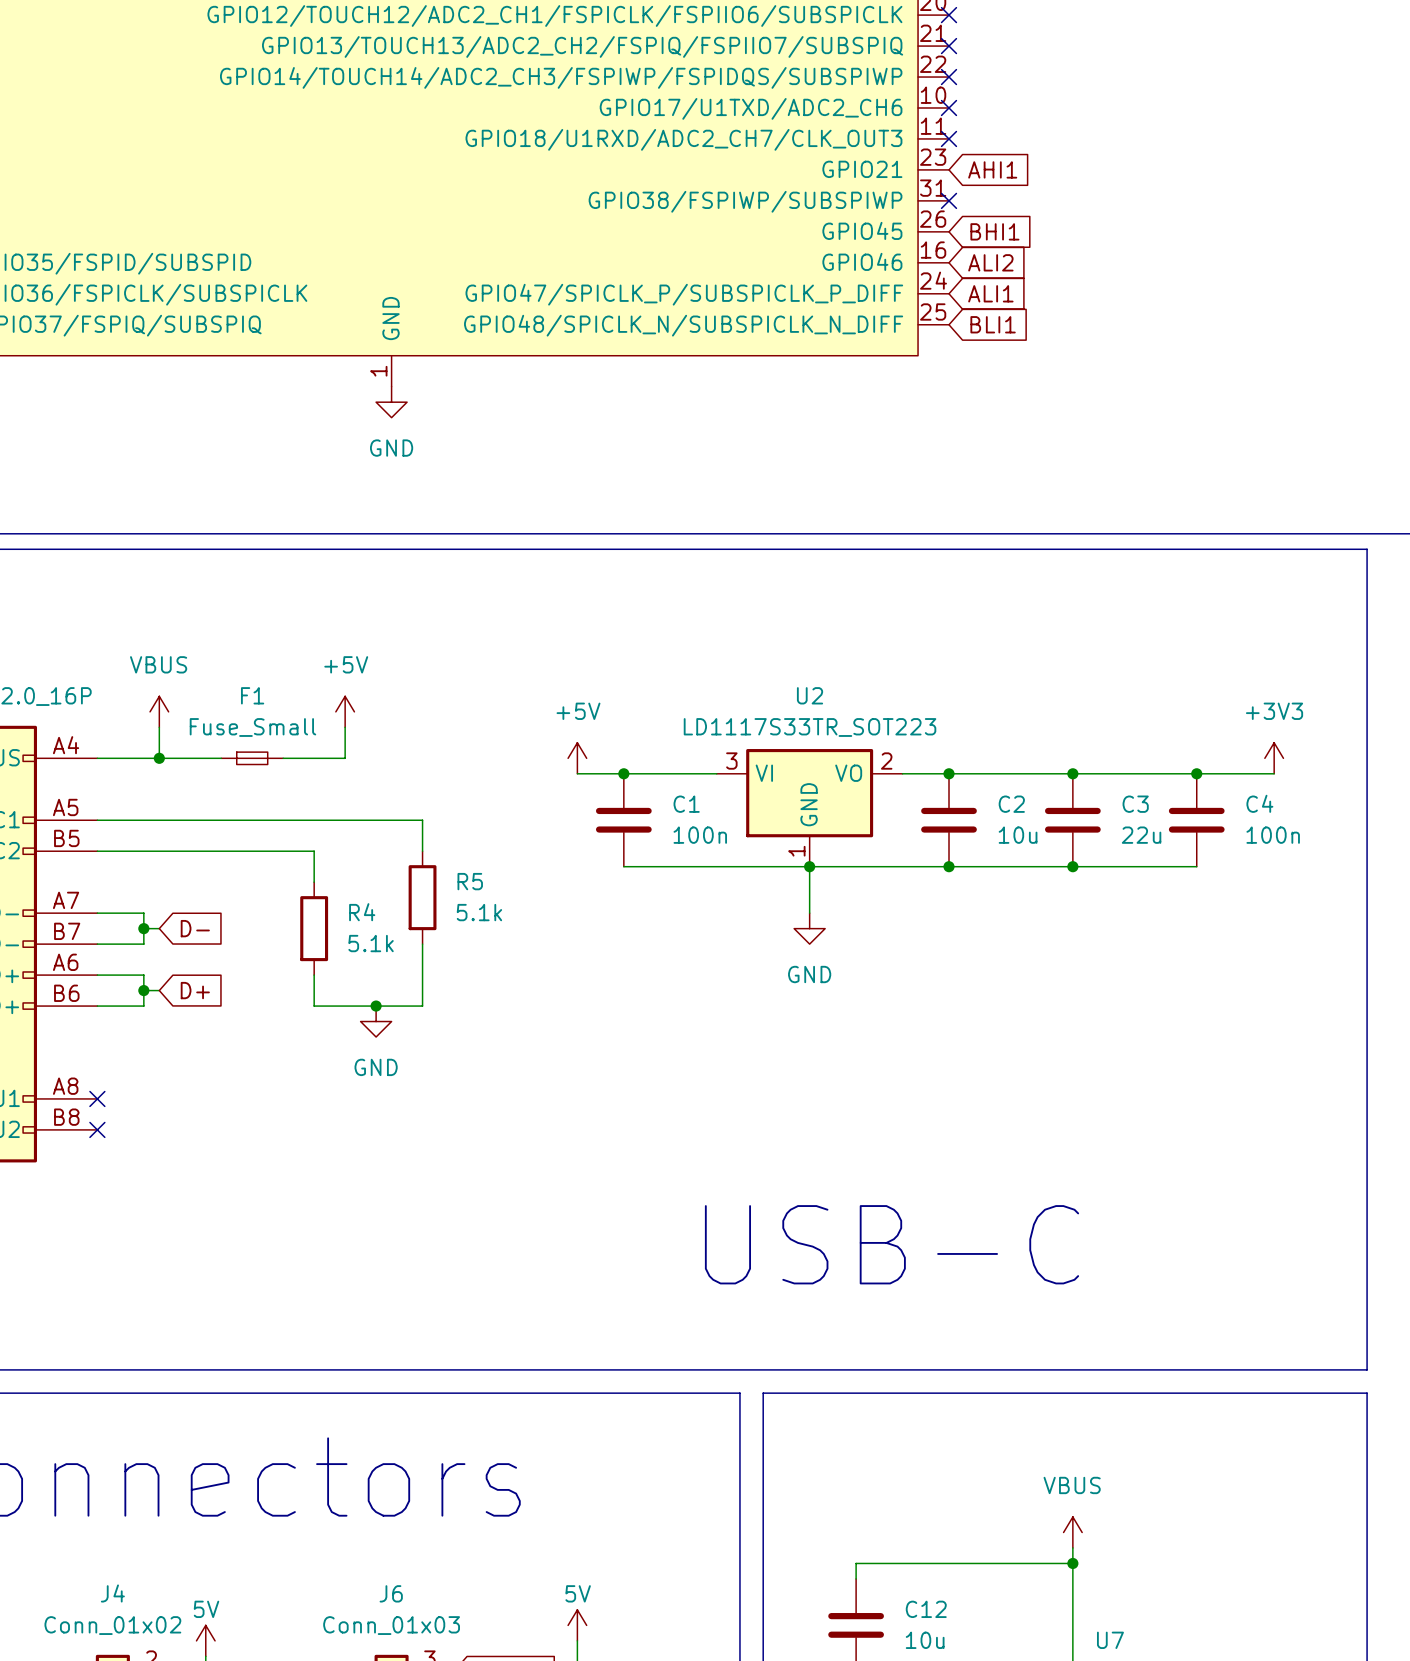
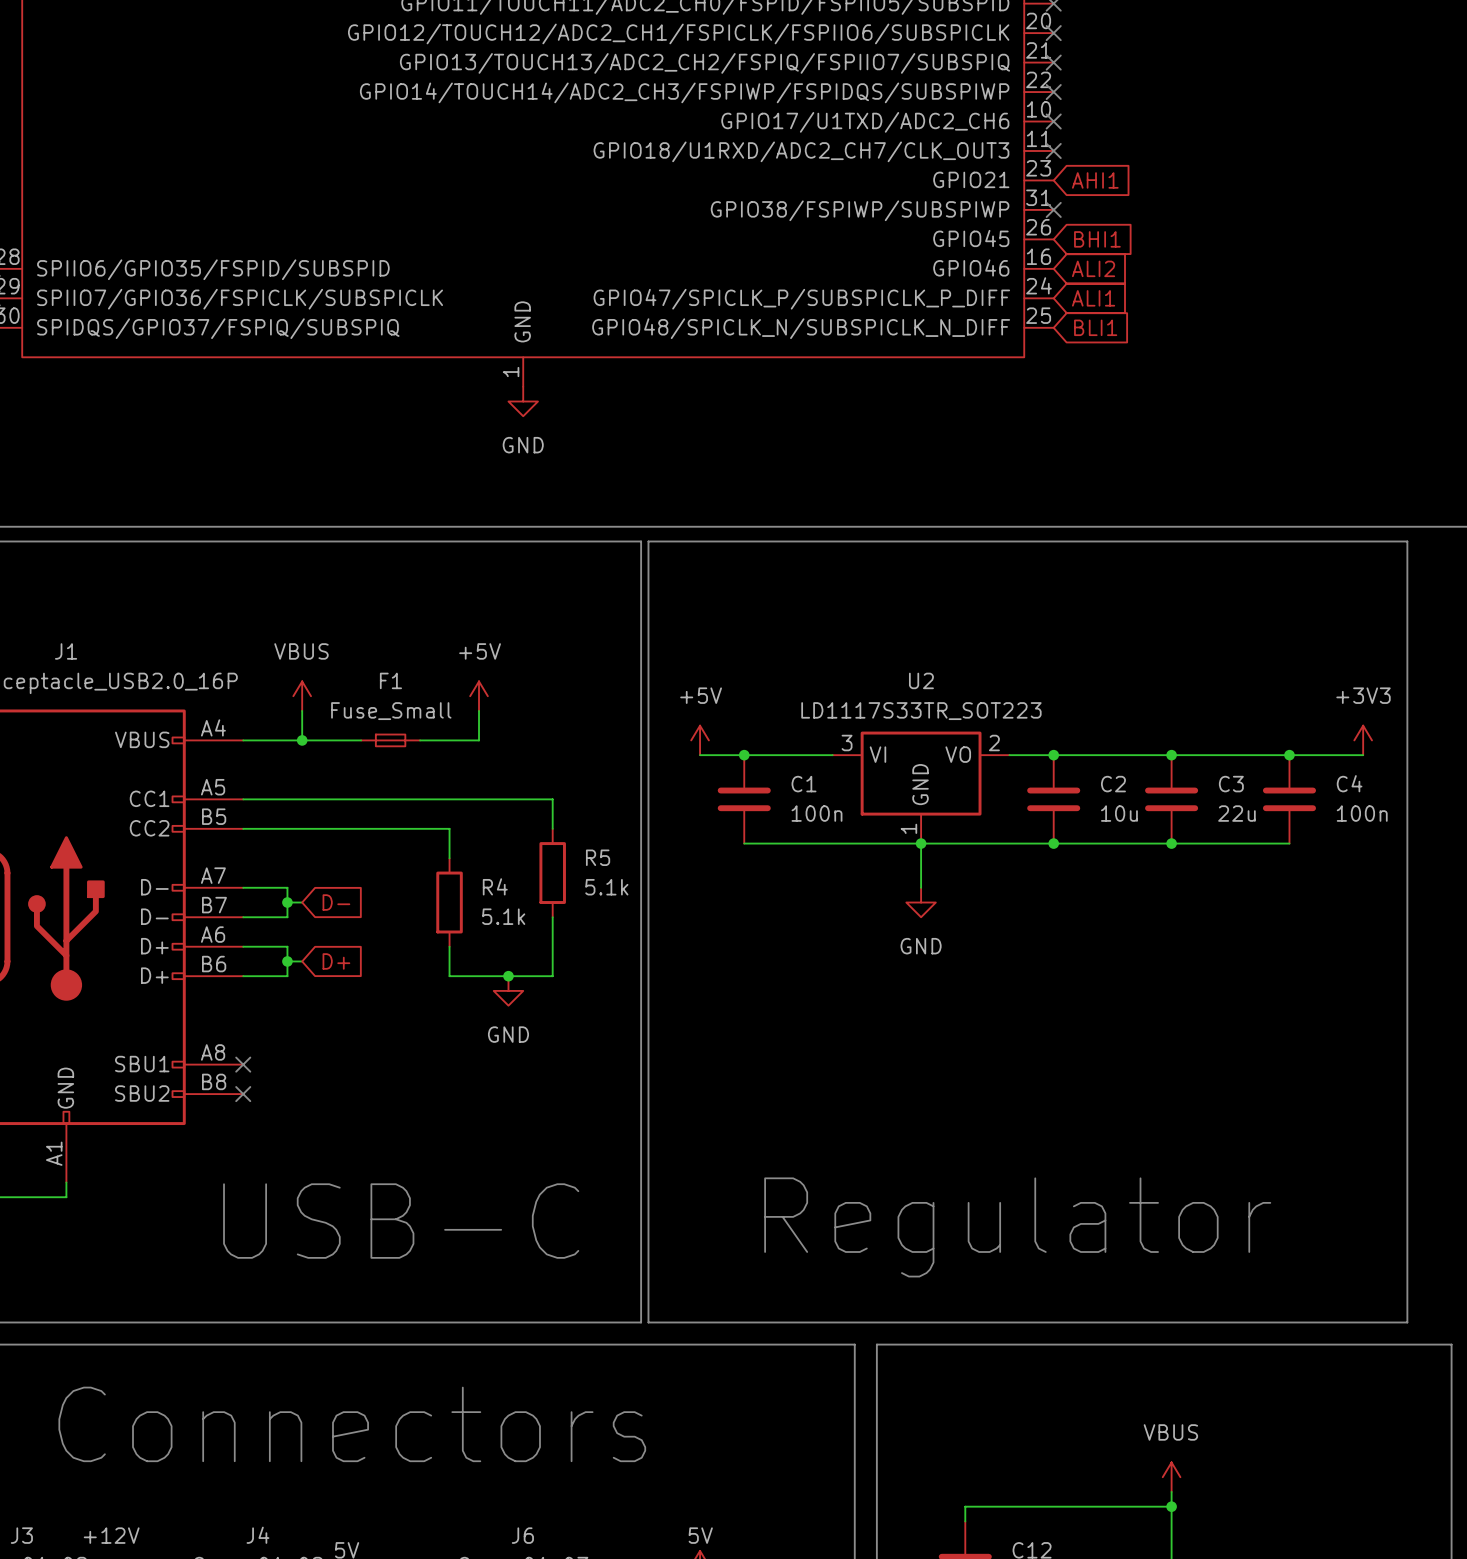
line: (515, 549) (523, 549) -> (641, 541) (641, 1322)
line: (1320, 549) (1367, 549) (1367, 1369) (1320, 1369) -> (1407, 541) (1407, 1322)
text: USB-C (892, 1244) -> none
text: none -> USB-C (401, 1221)
text: none -> Regulator (1017, 1227)
line: (515, 1369) (523, 1369) -> (648, 541) (648, 1322)

